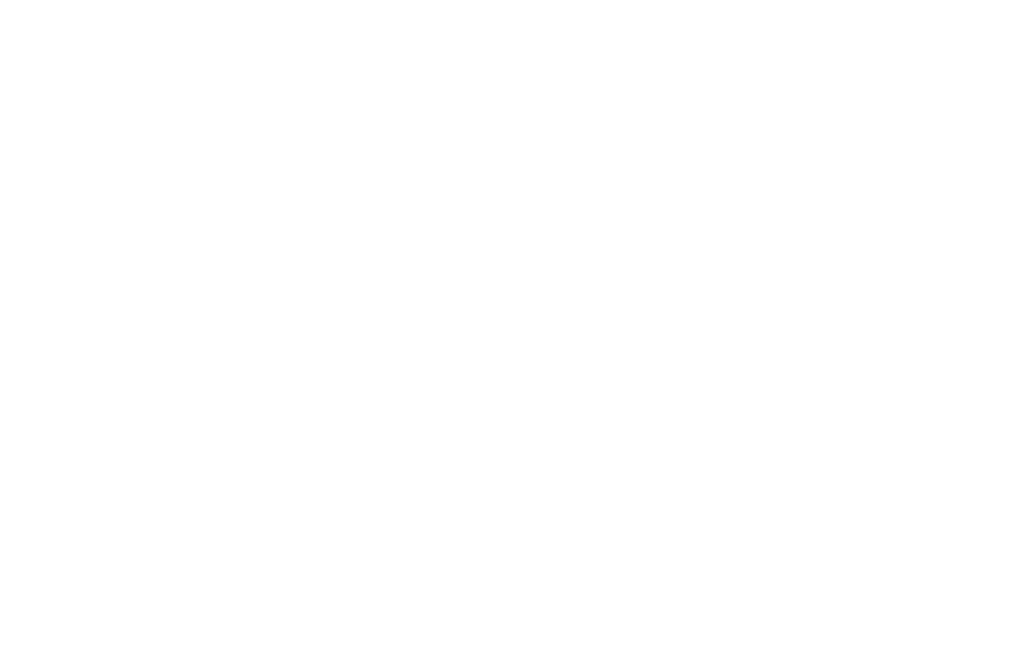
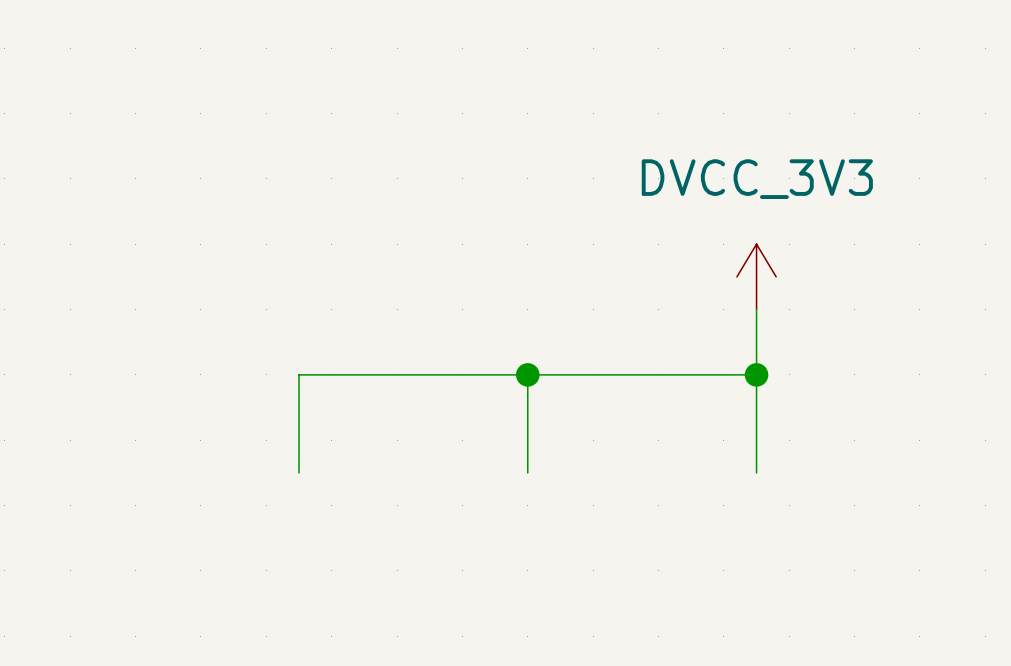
power symbol: none -> DVCC_3V3 (756, 276)
wire: none -> (756, 309) (756, 472)
wire: none -> (527, 374) (527, 472)
junction: none -> (527, 374)
wire: none -> (756, 374) (299, 374) (299, 472)
junction: none -> (756, 374)

